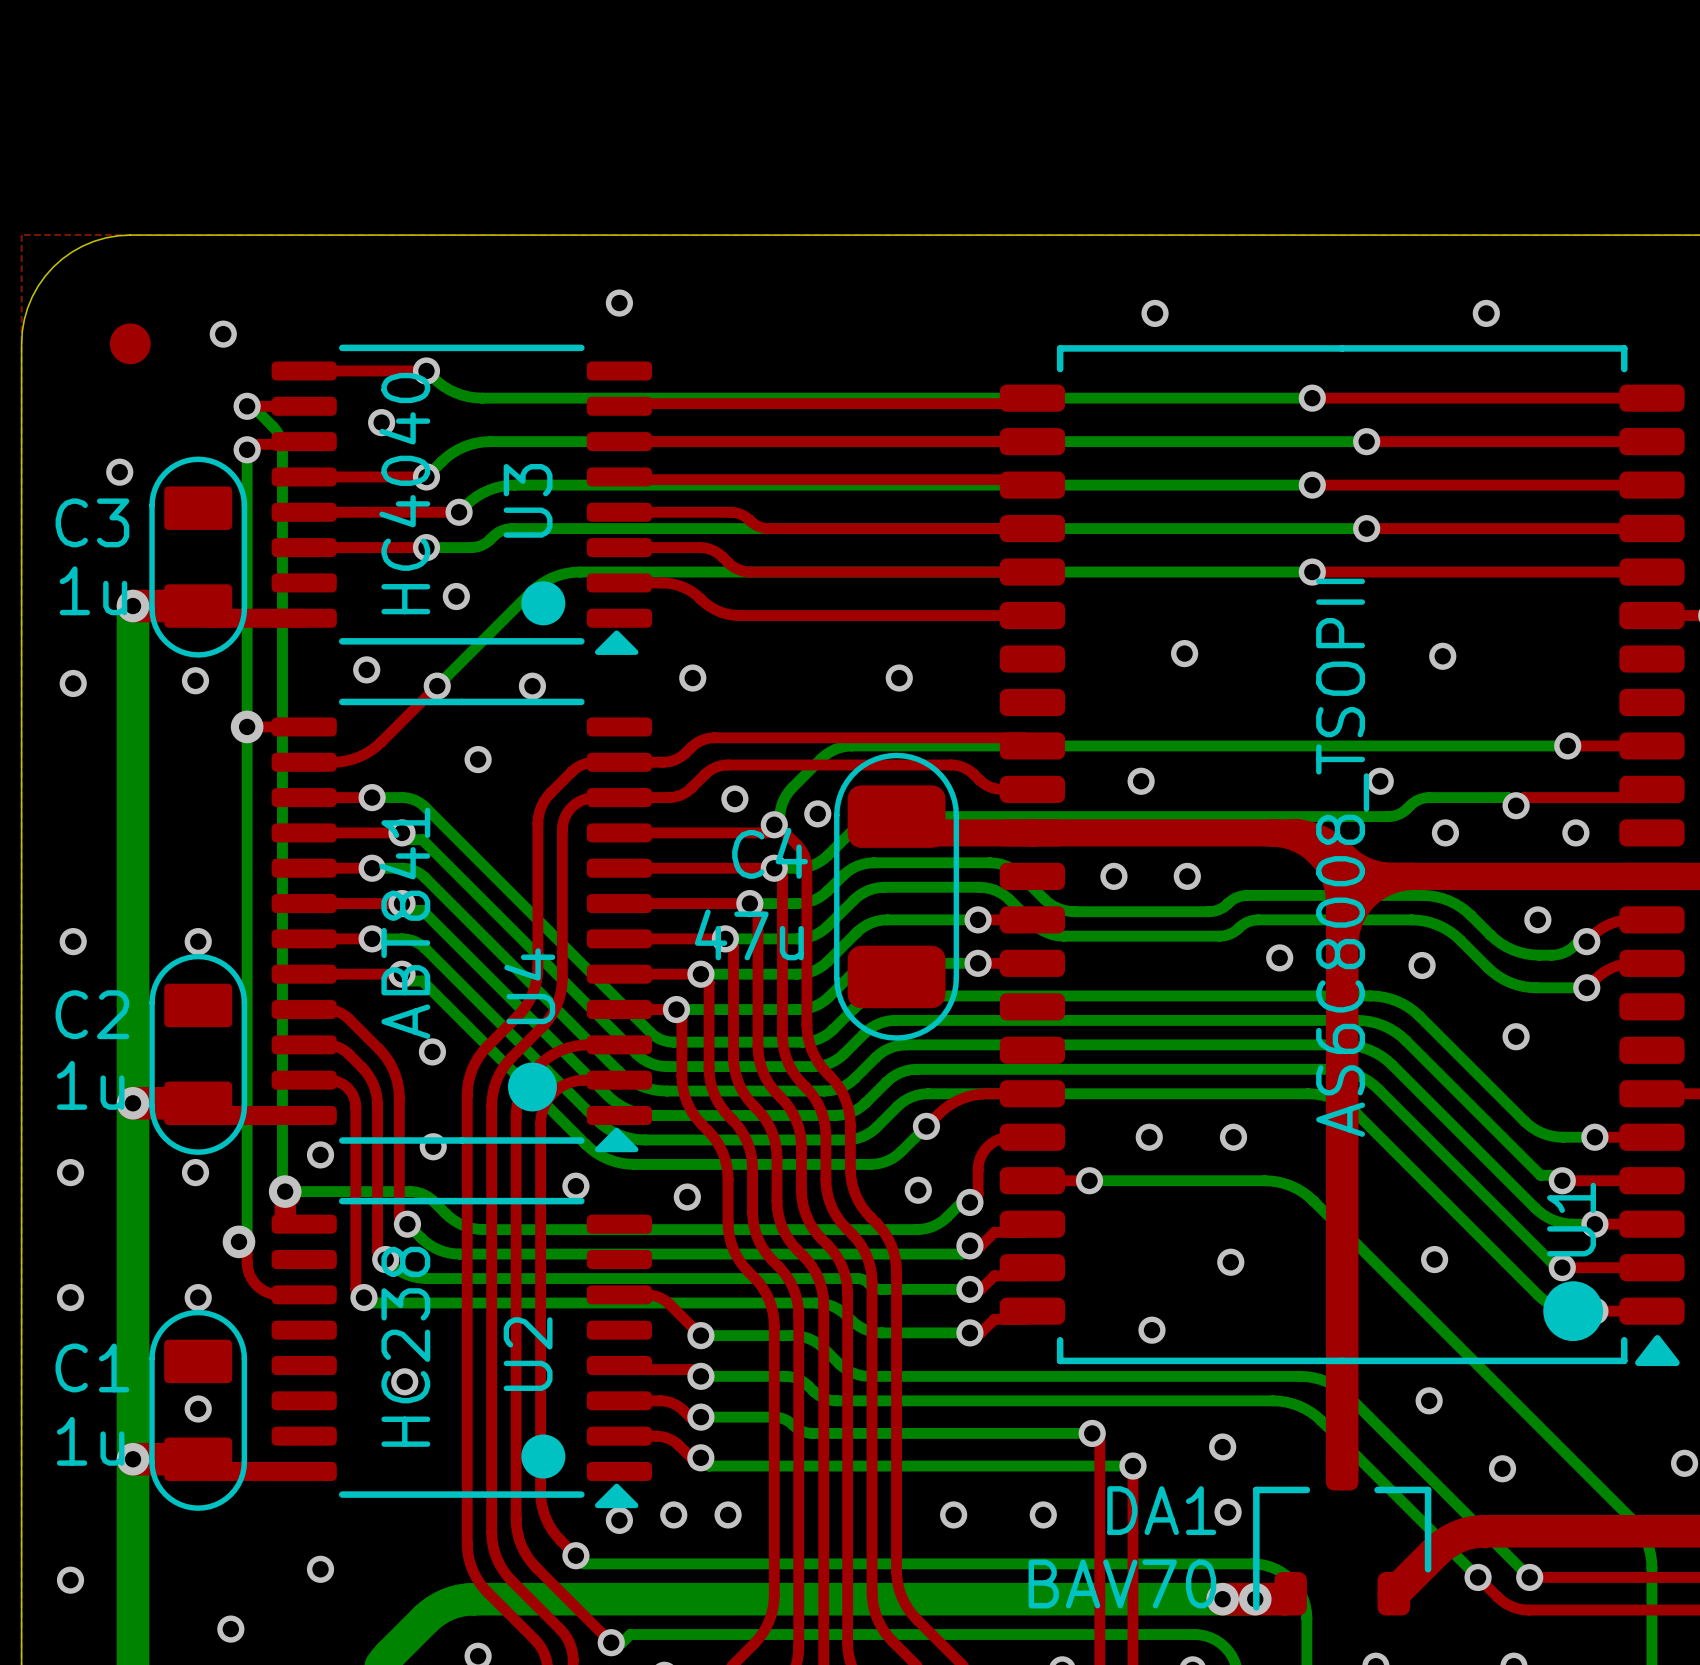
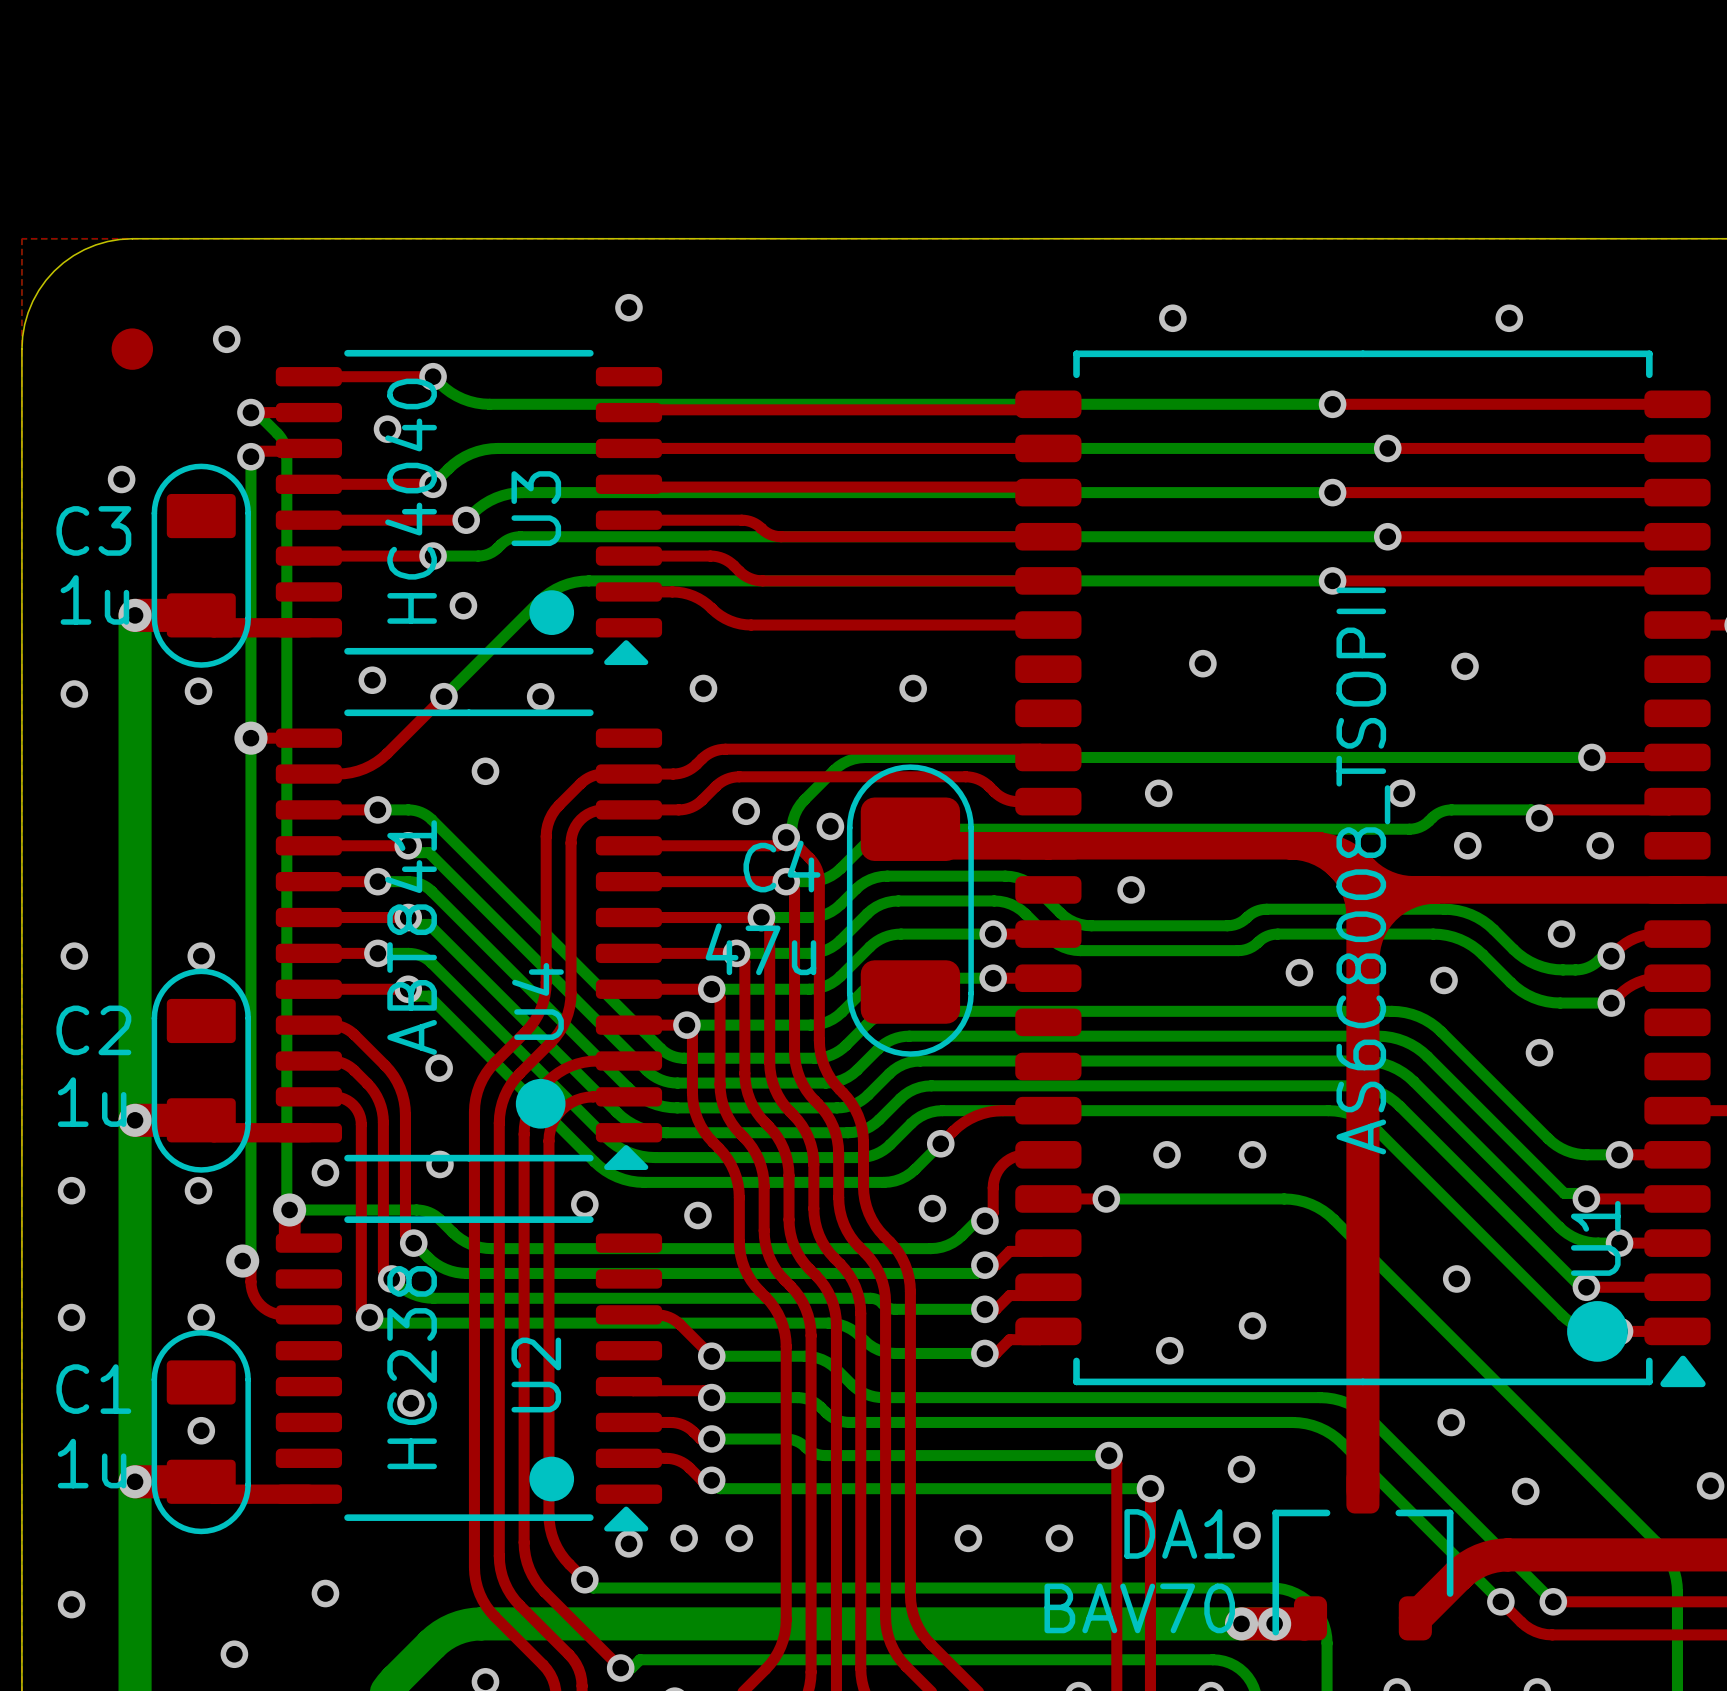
via: (1187, 876) -> none
via position: (1230, 1262) -> (1252, 1325)

